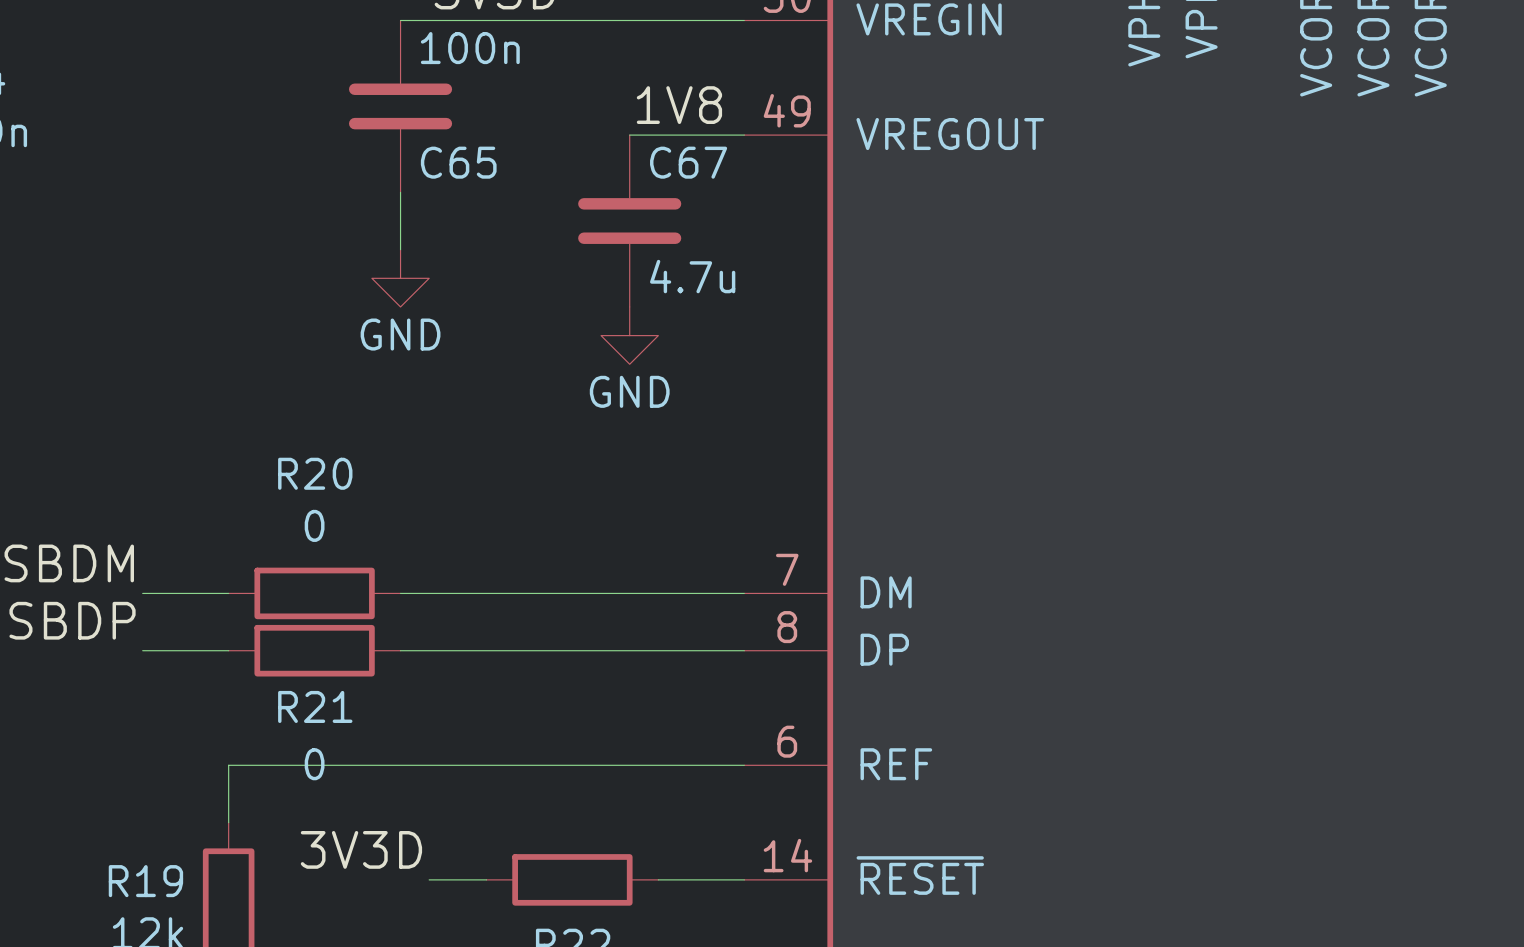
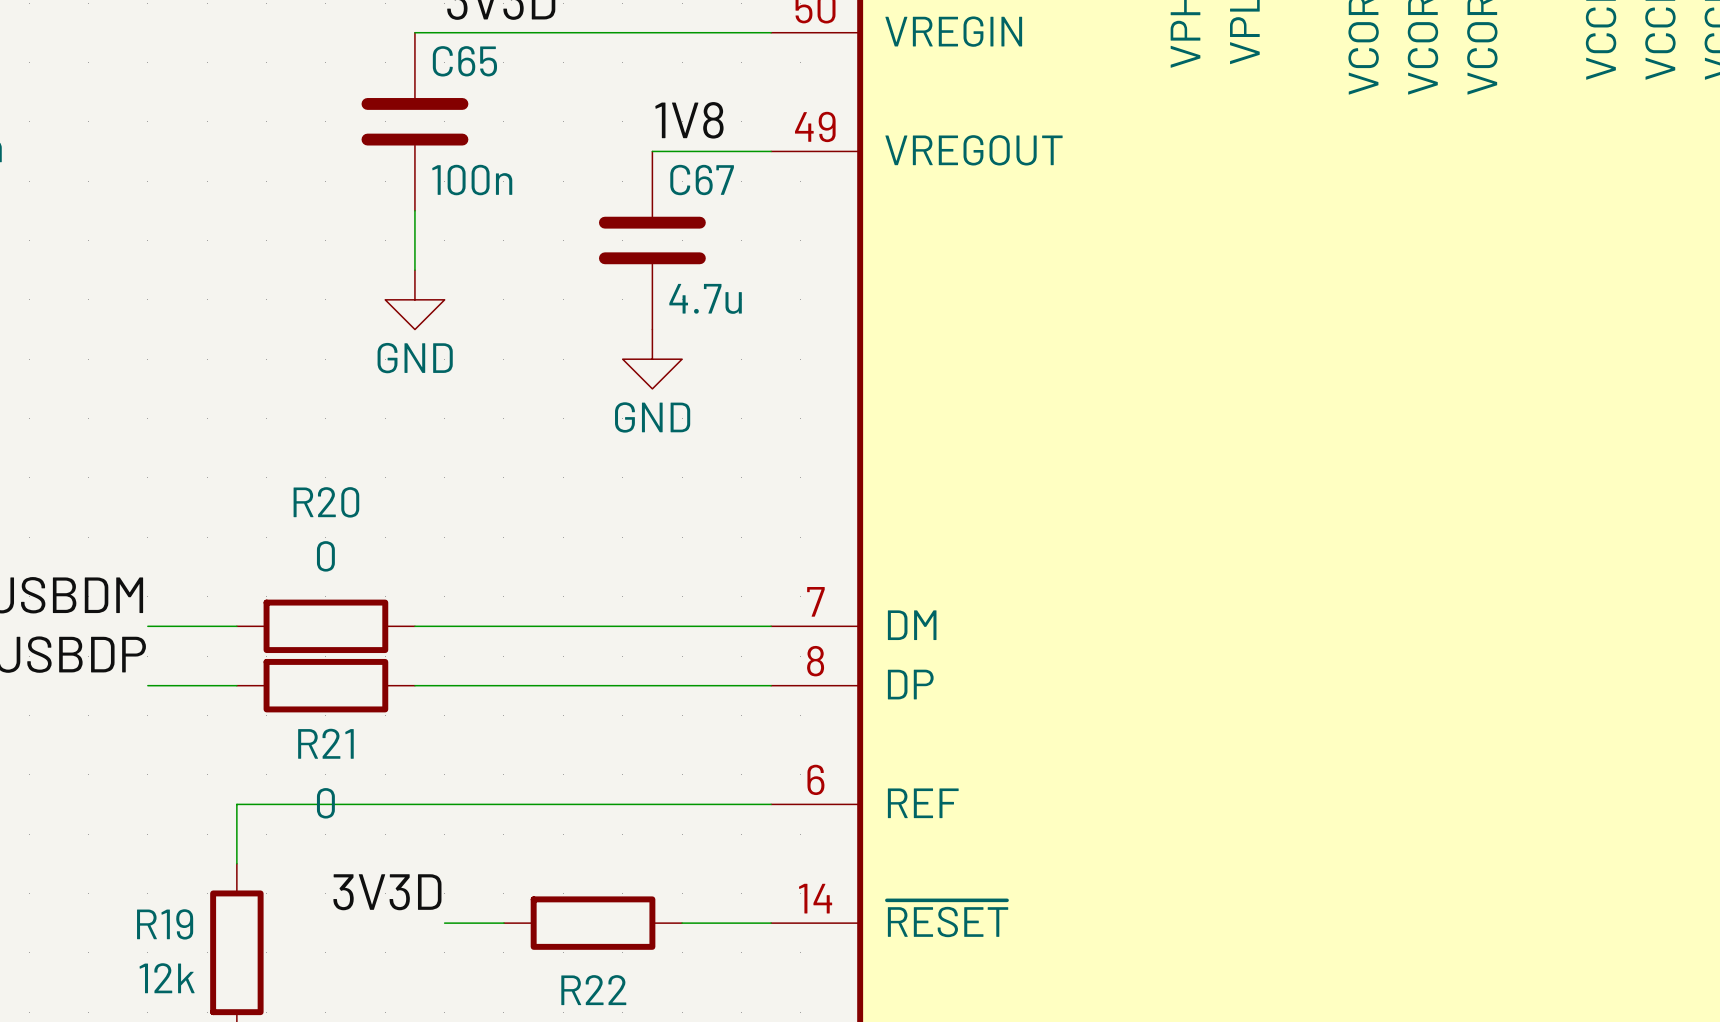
C65 value position: 100n (470, 48) -> 100n (472, 180)
C65 name position: C65 (458, 162) -> C65 (464, 61)

